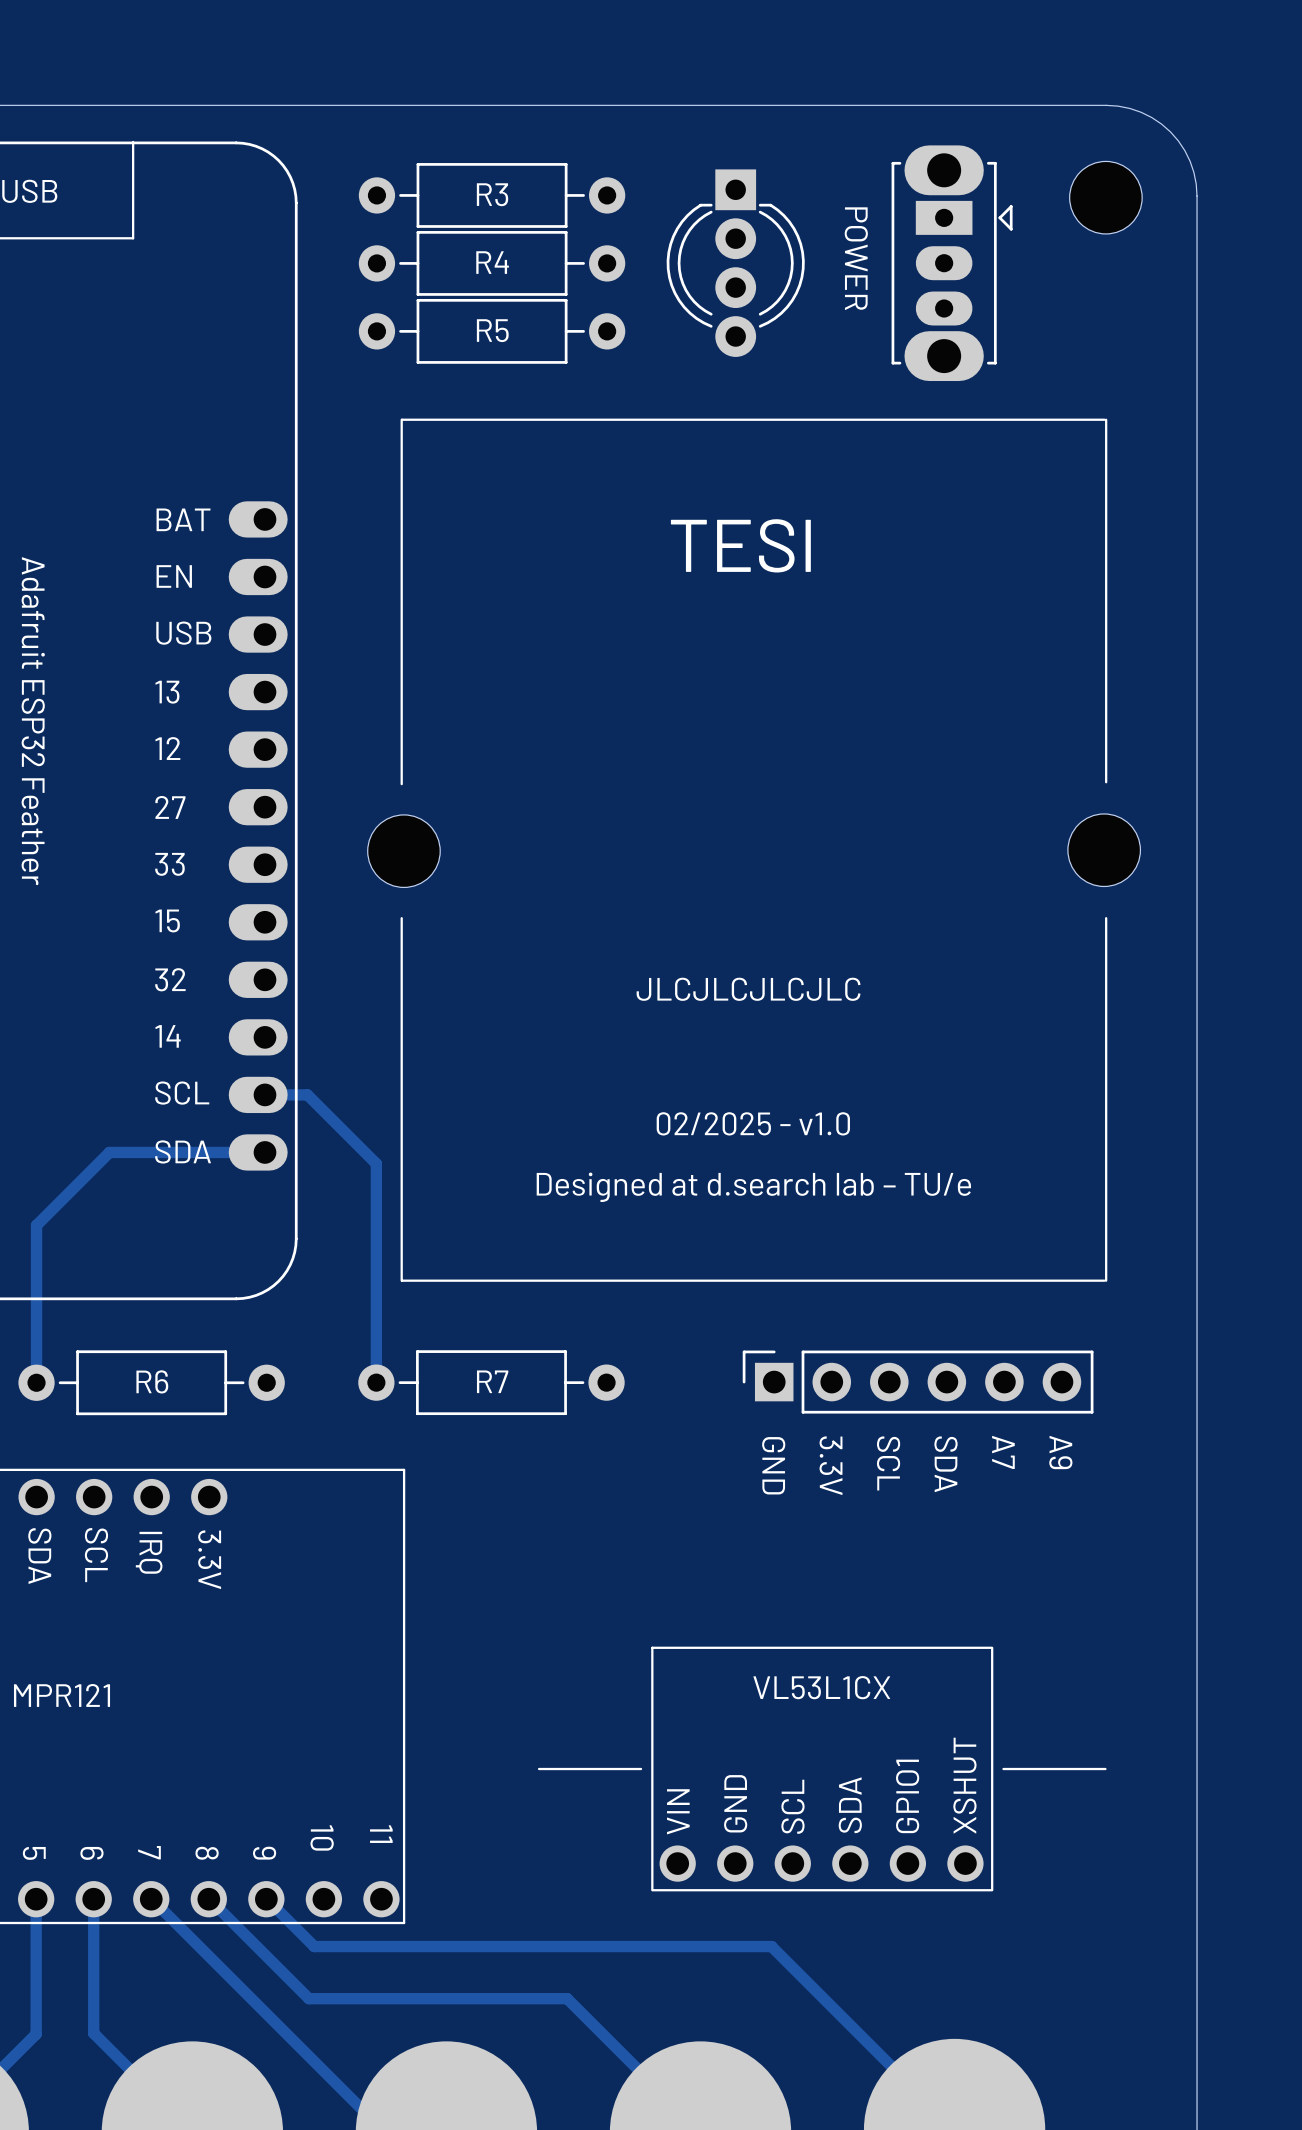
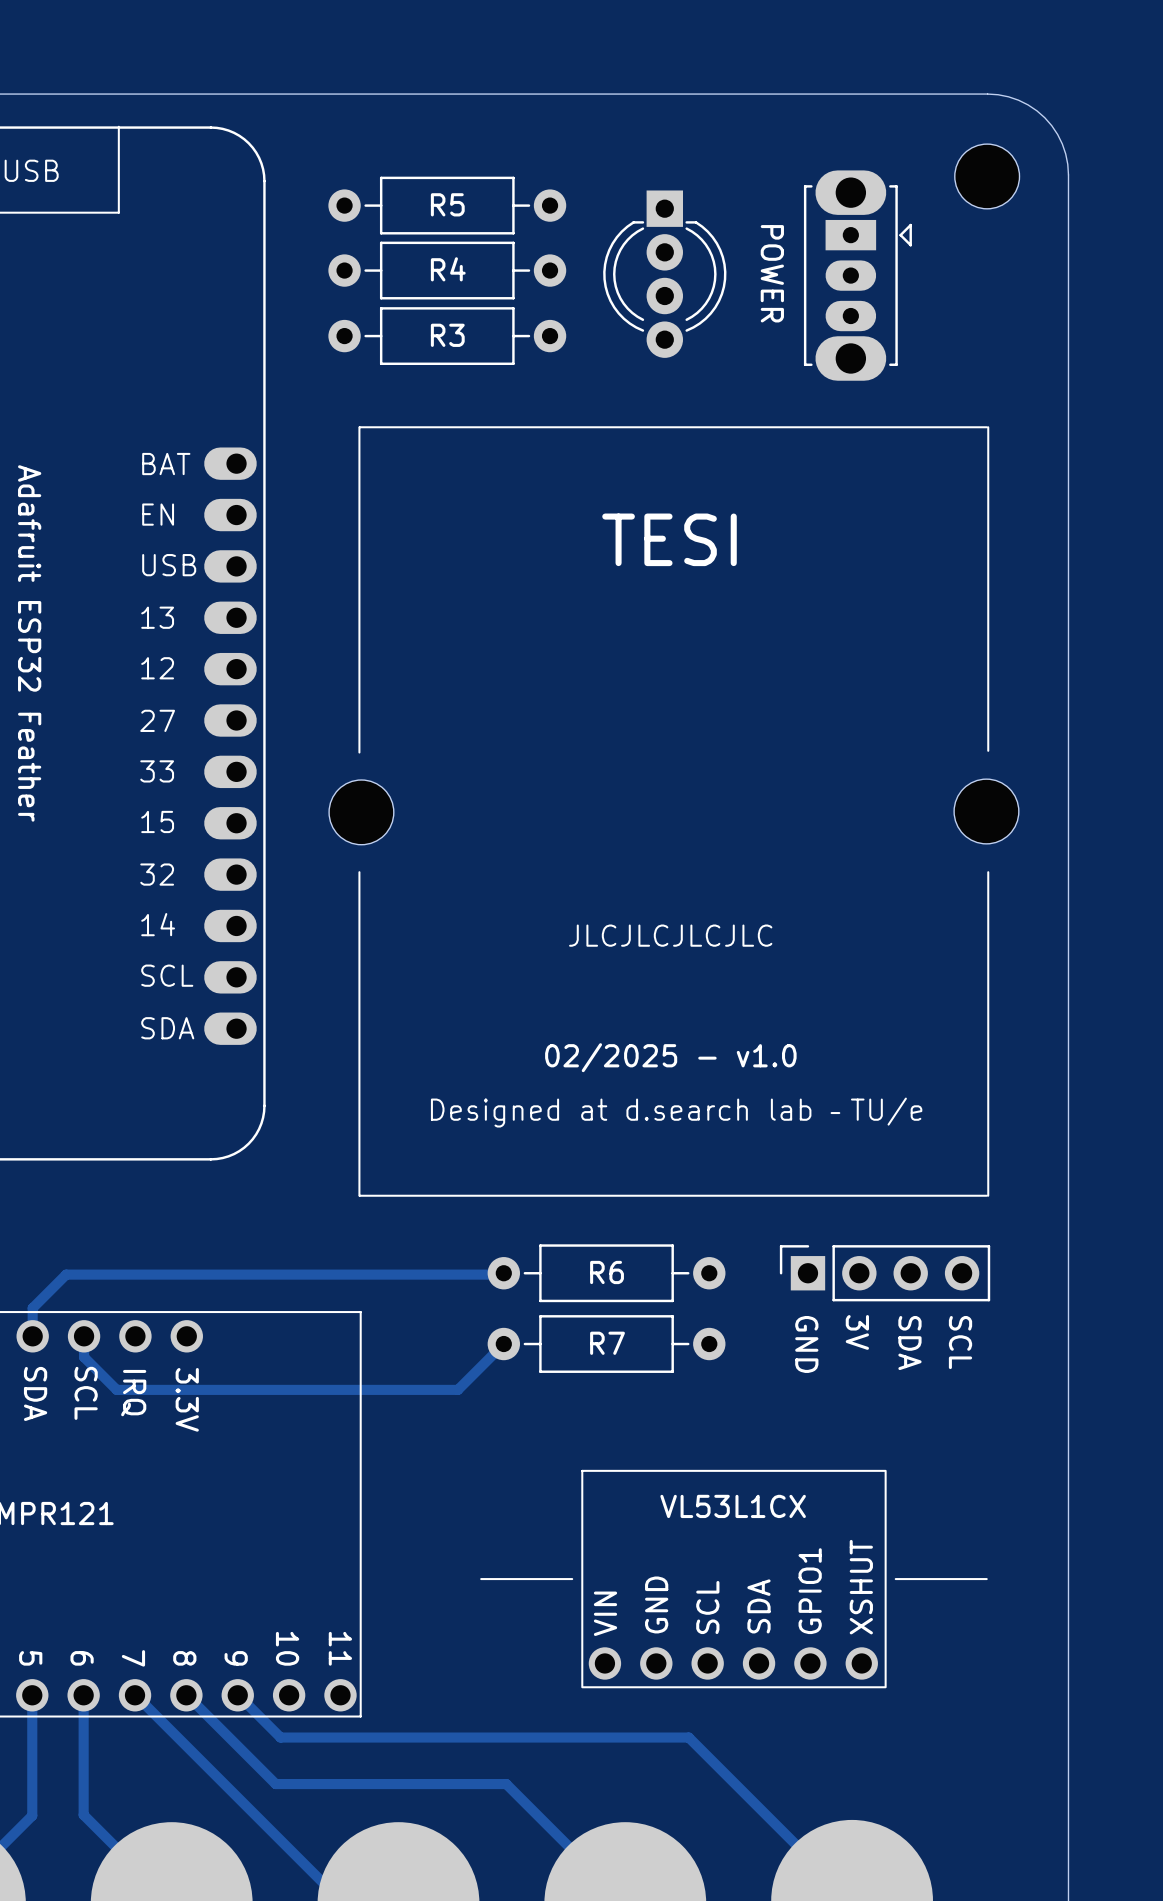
R3 position: (492, 195) -> (447, 336)
text position: POWER (856, 258) -> POWER (772, 273)
R4 position: (492, 263) -> (447, 270)
part position: (735, 263) -> (664, 274)
part position: (952, 263) -> (857, 275)
R5 position: (492, 331) -> (447, 205)
line: (401, 419) (401, 784) -> (359, 427) (359, 752)
line: (402, 419) (1104, 419) -> (359, 427) (986, 427)
line: (1106, 419) (1106, 782) -> (988, 427) (988, 750)
text position: TESI (740, 545) -> TESI (669, 539)
part position: (1104, 850) -> (986, 811)
part position: (403, 851) -> (361, 812)
line: (401, 918) (401, 1280) -> (359, 872) (359, 1195)
line: (1106, 918) (1106, 1280) -> (988, 872) (988, 1195)
text position: JLCJLCJLCJLC (748, 989) -> JLCJLCJLCJLC (670, 935)
track: (264, 1094) (307, 1094) (376, 1163) (376, 1382) -> none
text position: 02/2025 - v1.0 (753, 1123) -> 02/2025 - v1.0 (670, 1057)
track: (264, 1152) (109, 1152) (36, 1225) (36, 1382) -> none
text position: Designed at d.search lab – TU/e (753, 1187) -> Designed at d.search lab – TU/e (676, 1112)
line: (402, 1280) (1104, 1280) -> (359, 1195) (986, 1195)
R6 position: (151, 1382) -> (606, 1273)
R7 position: (491, 1382) -> (606, 1344)
part: (918, 1382) -> none
track: none -> (503, 1273) (66, 1274) (32, 1308) (32, 1336)
part: none -> (885, 1273)
text: A7 (1003, 1452) -> none
text: A9 (1060, 1452) -> none
text position: SCL (888, 1463) -> SCL (960, 1342)
text position: SDA (946, 1464) -> SDA (909, 1343)
text position: GND (773, 1465) -> GND (806, 1344)
text: 3.3V (831, 1465) -> none
text: none -> 3V (857, 1332)
track: none -> (84, 1336) (84, 1357) (116, 1389) (457, 1389) (503, 1344)

